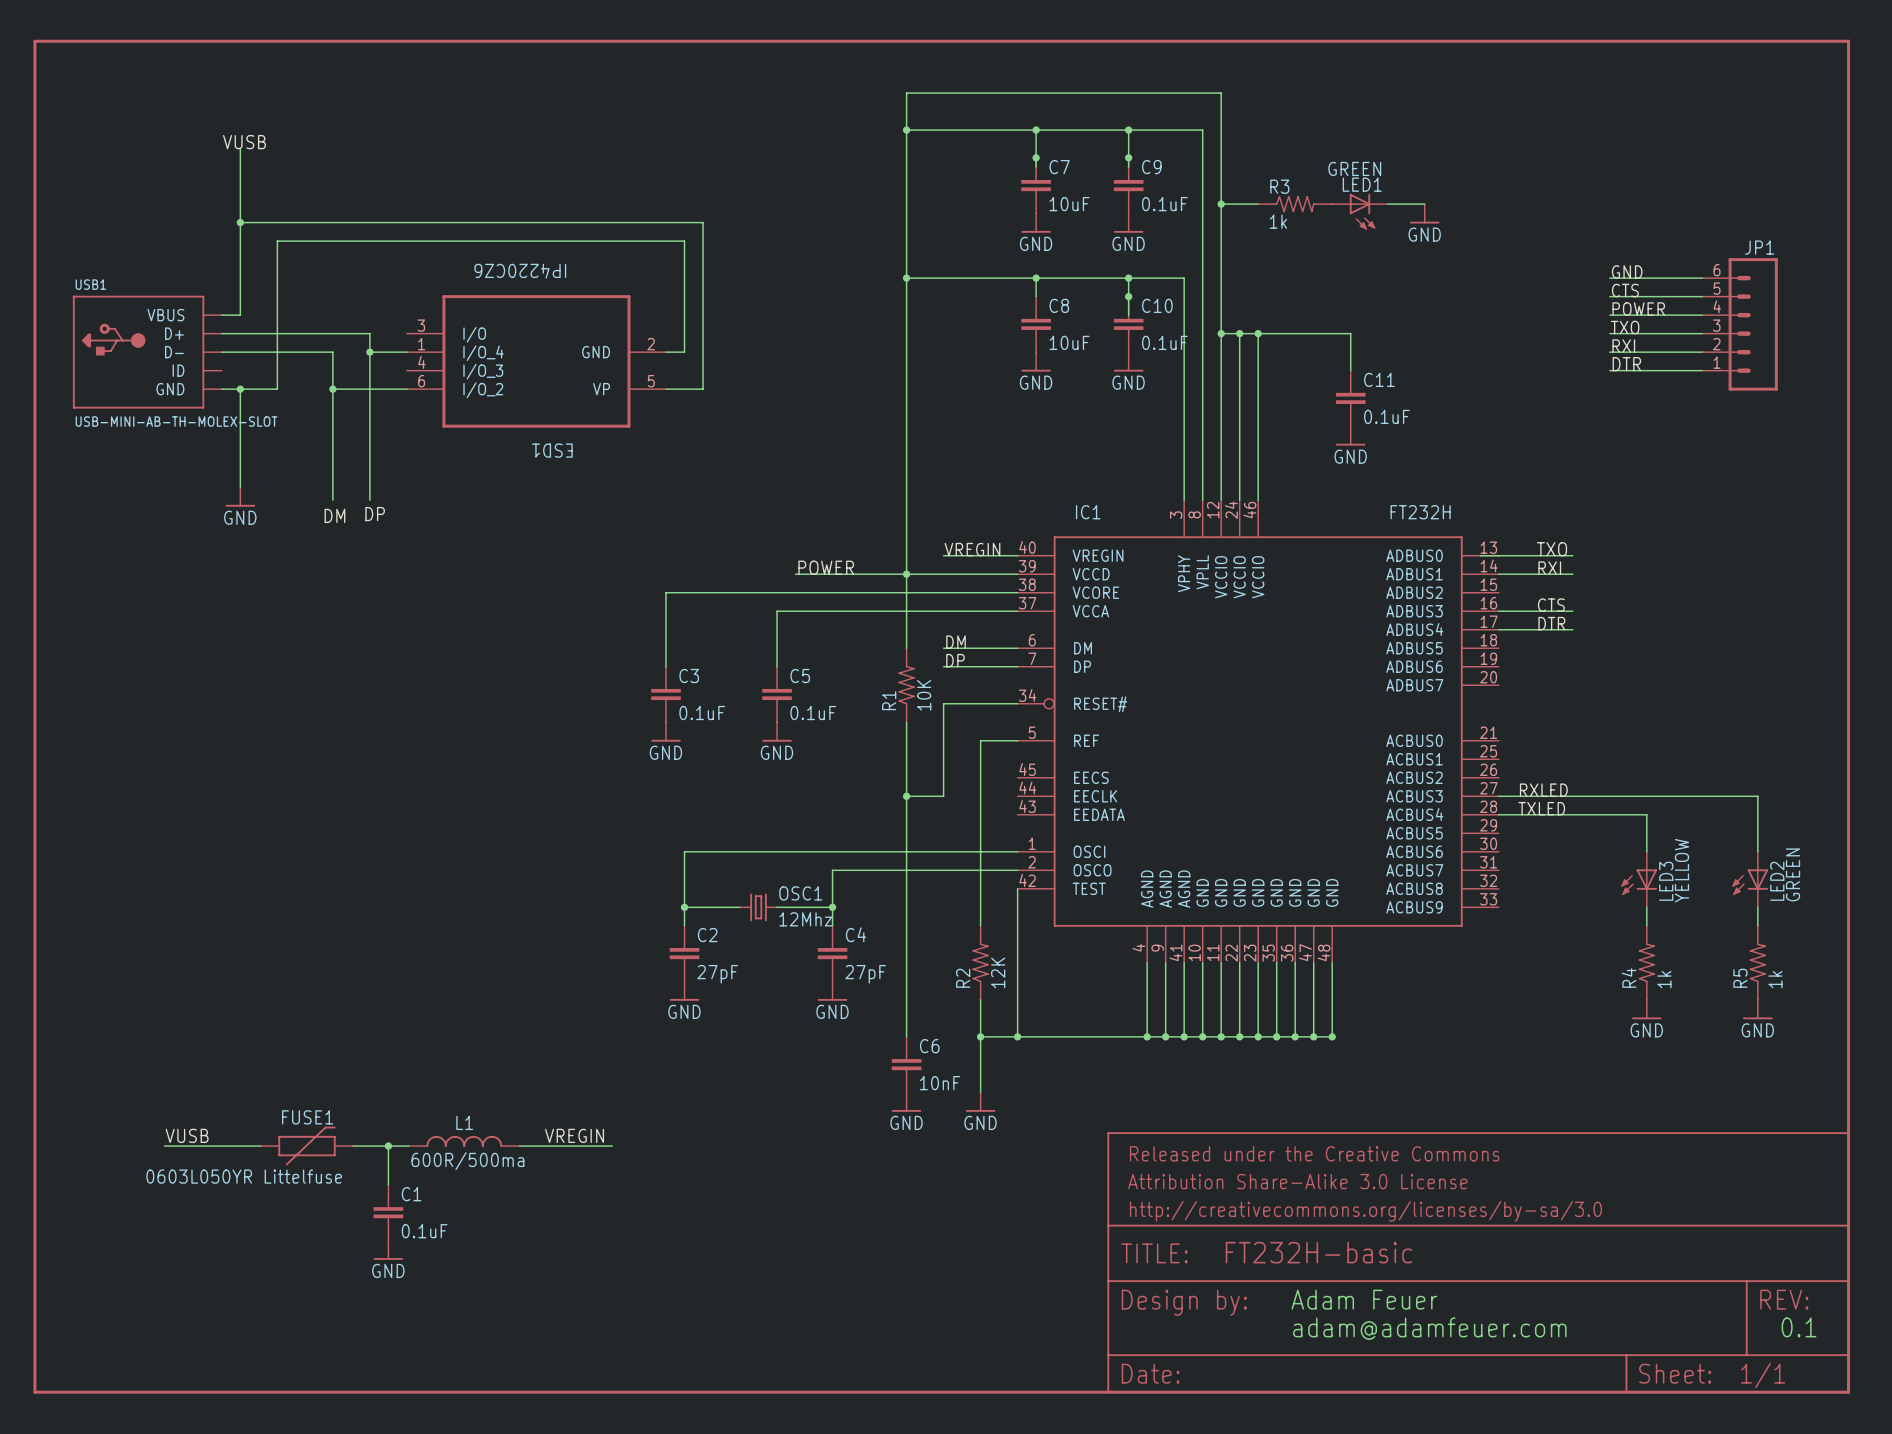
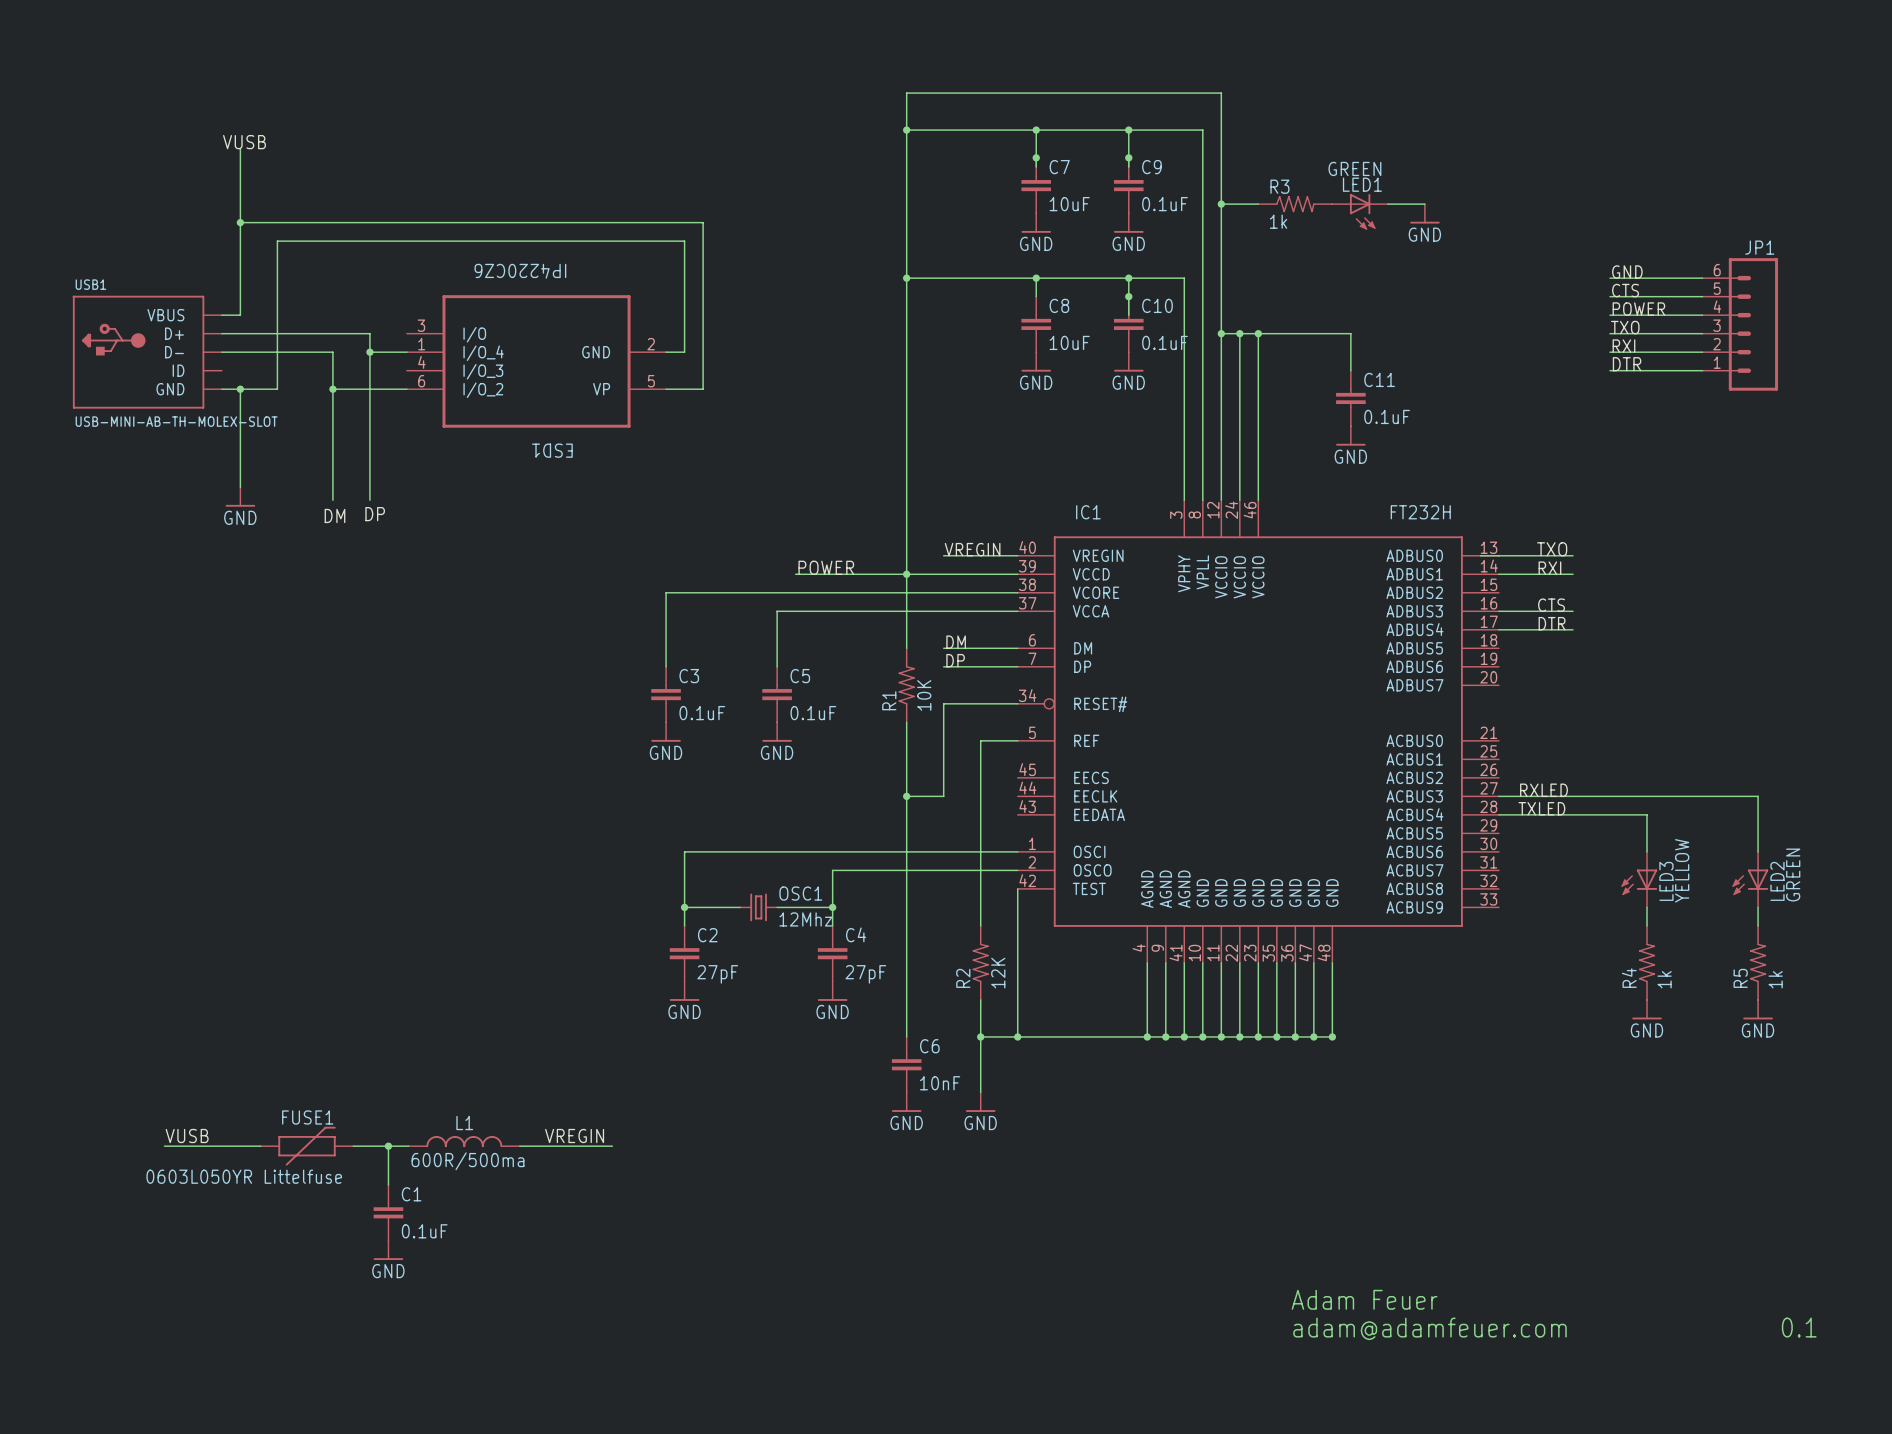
part: (941, 716) -> none
part: (1478, 1262) -> none

